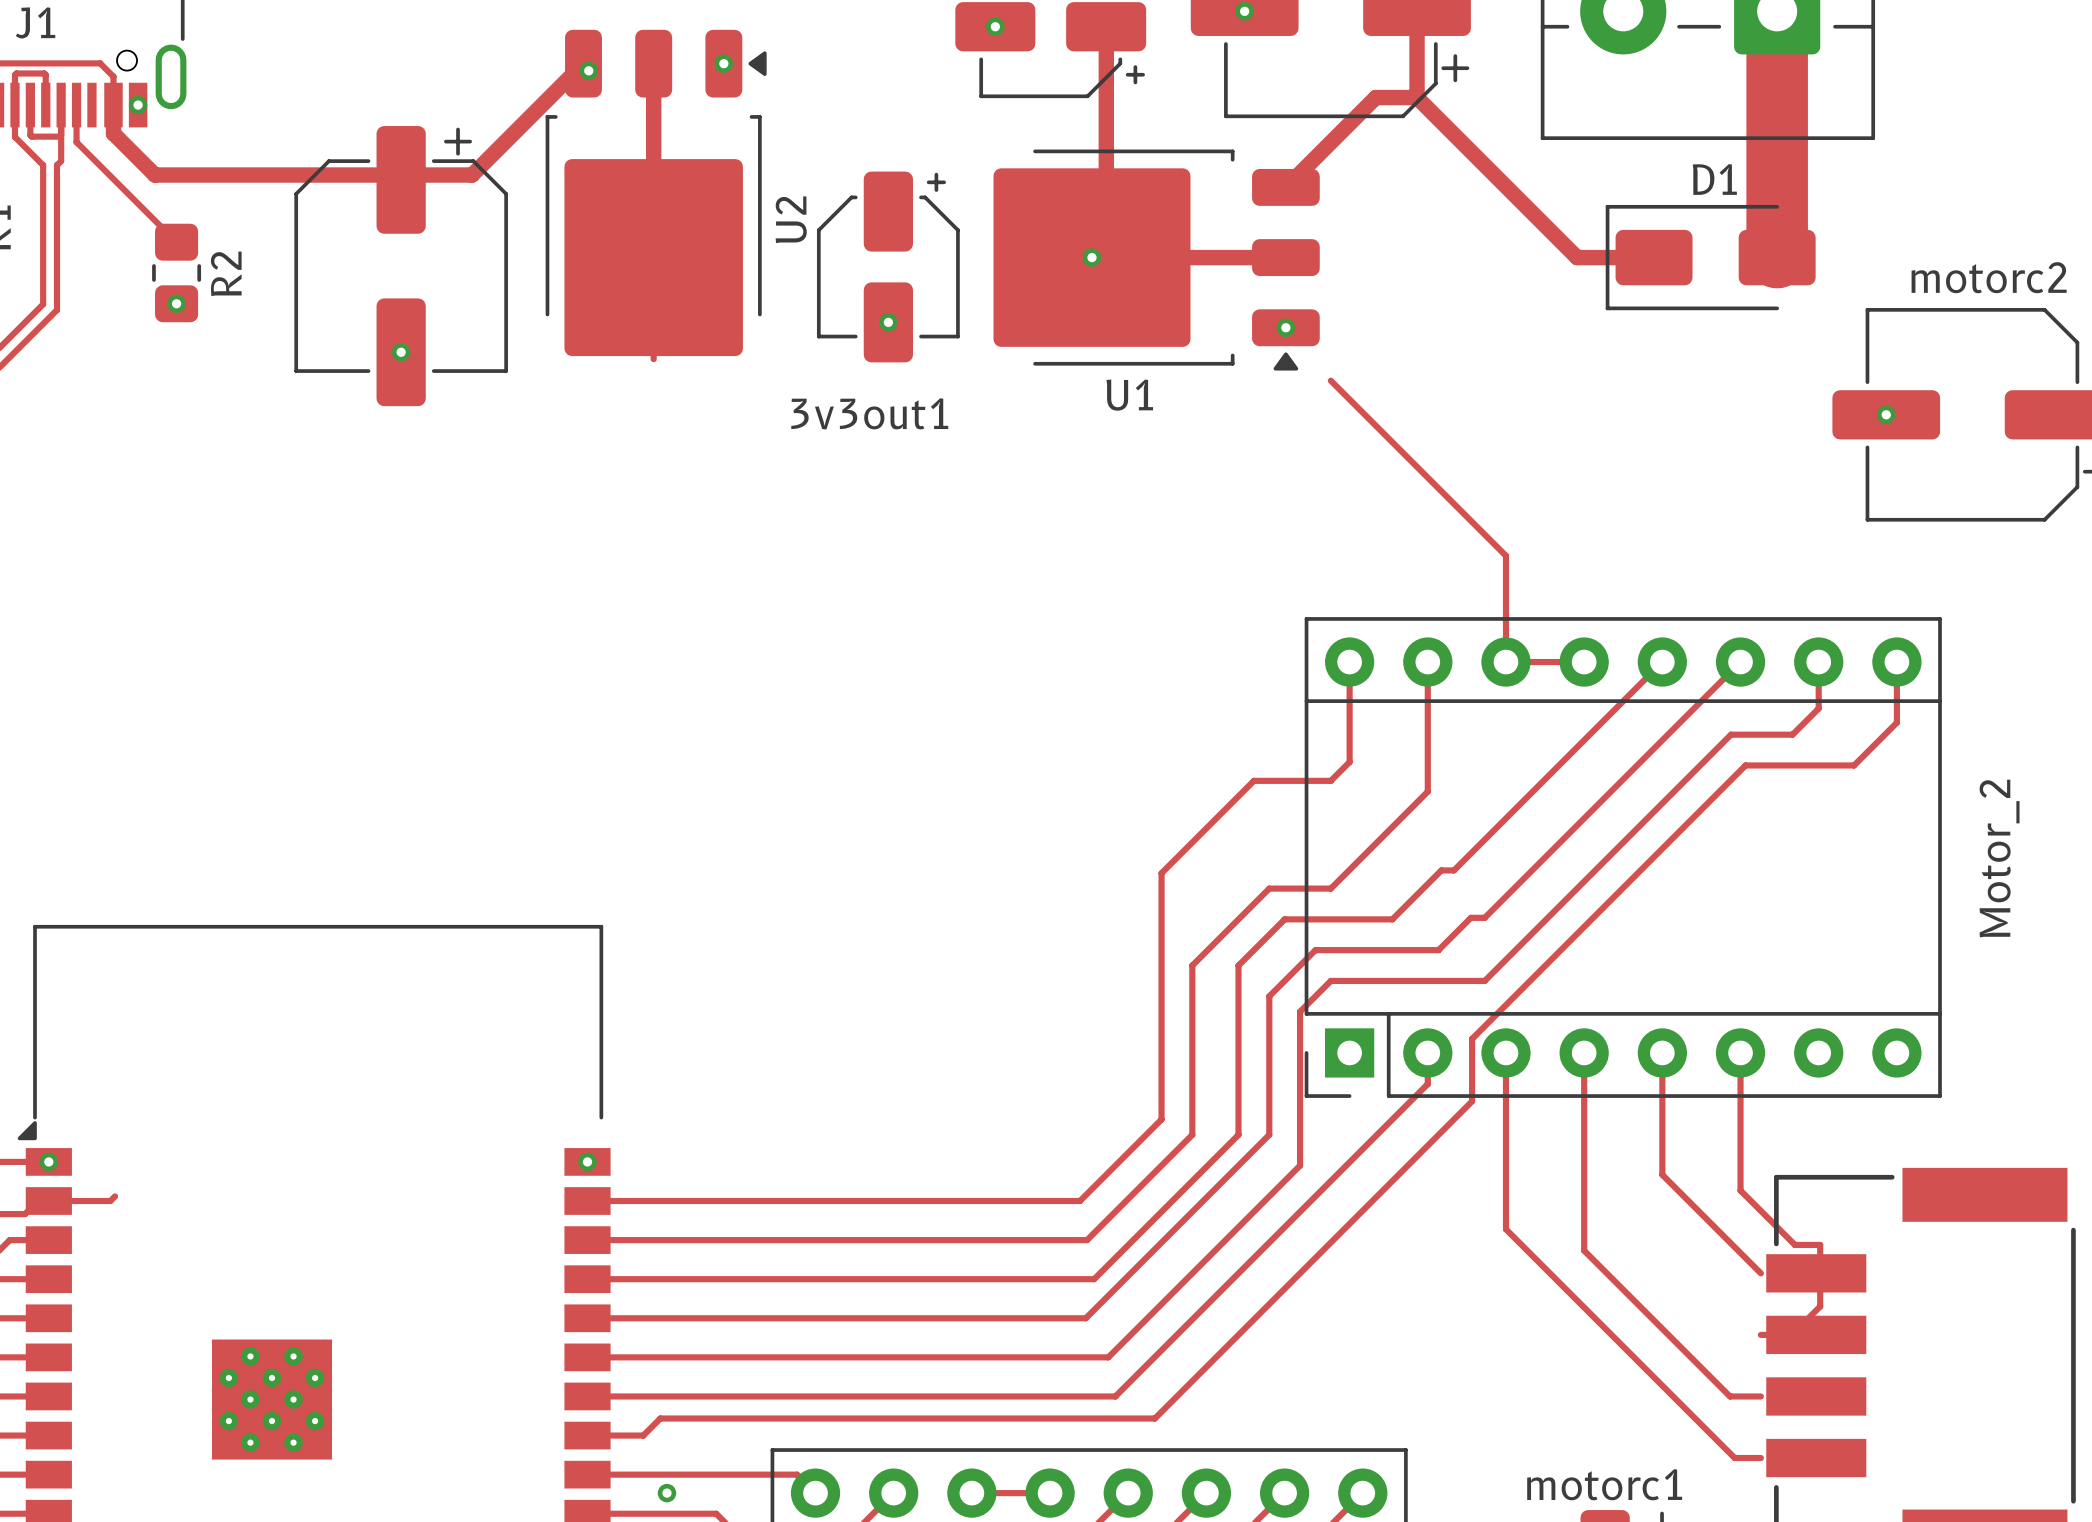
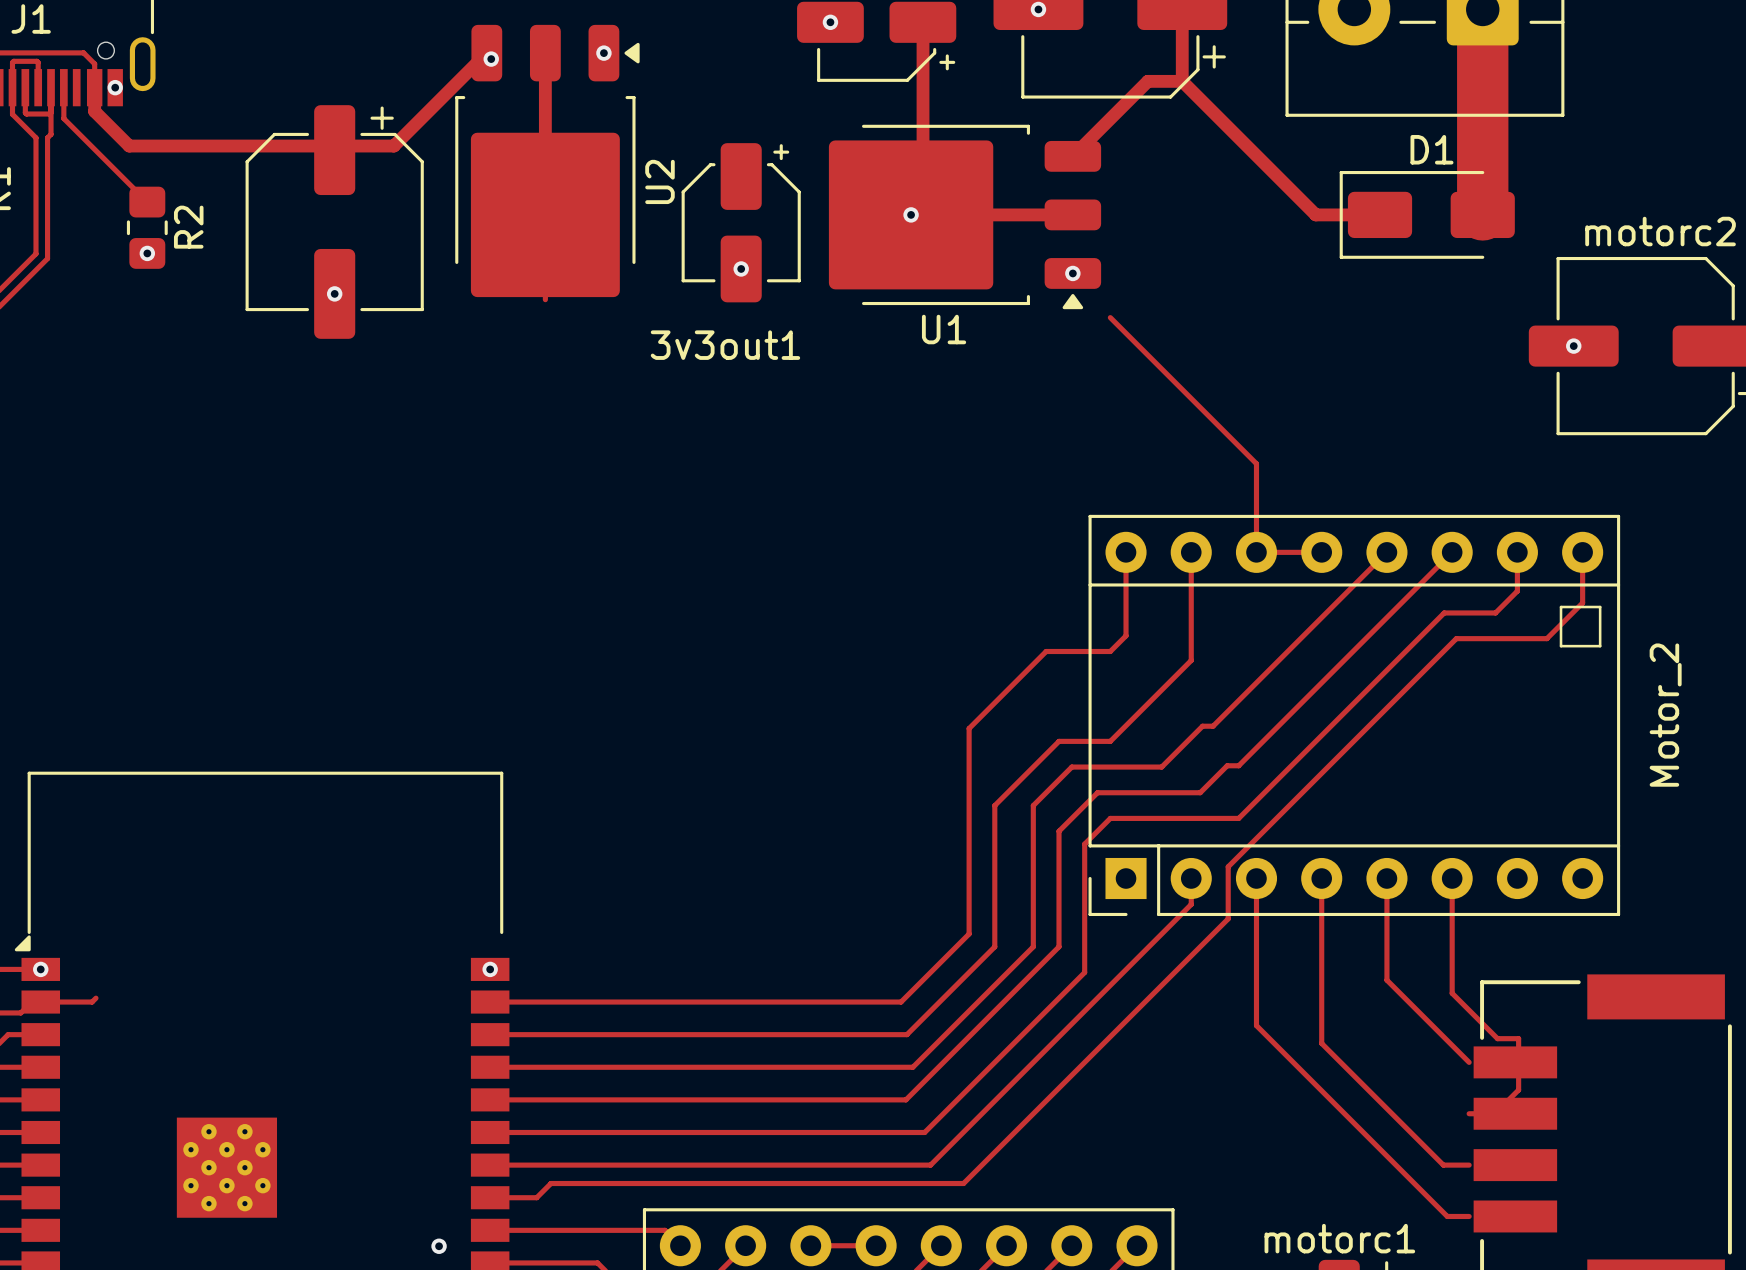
line: none -> (1561, 607) (1600, 607) (1600, 646) (1561, 646) (1561, 607)
via position: (666, 1493) -> (439, 1246)

